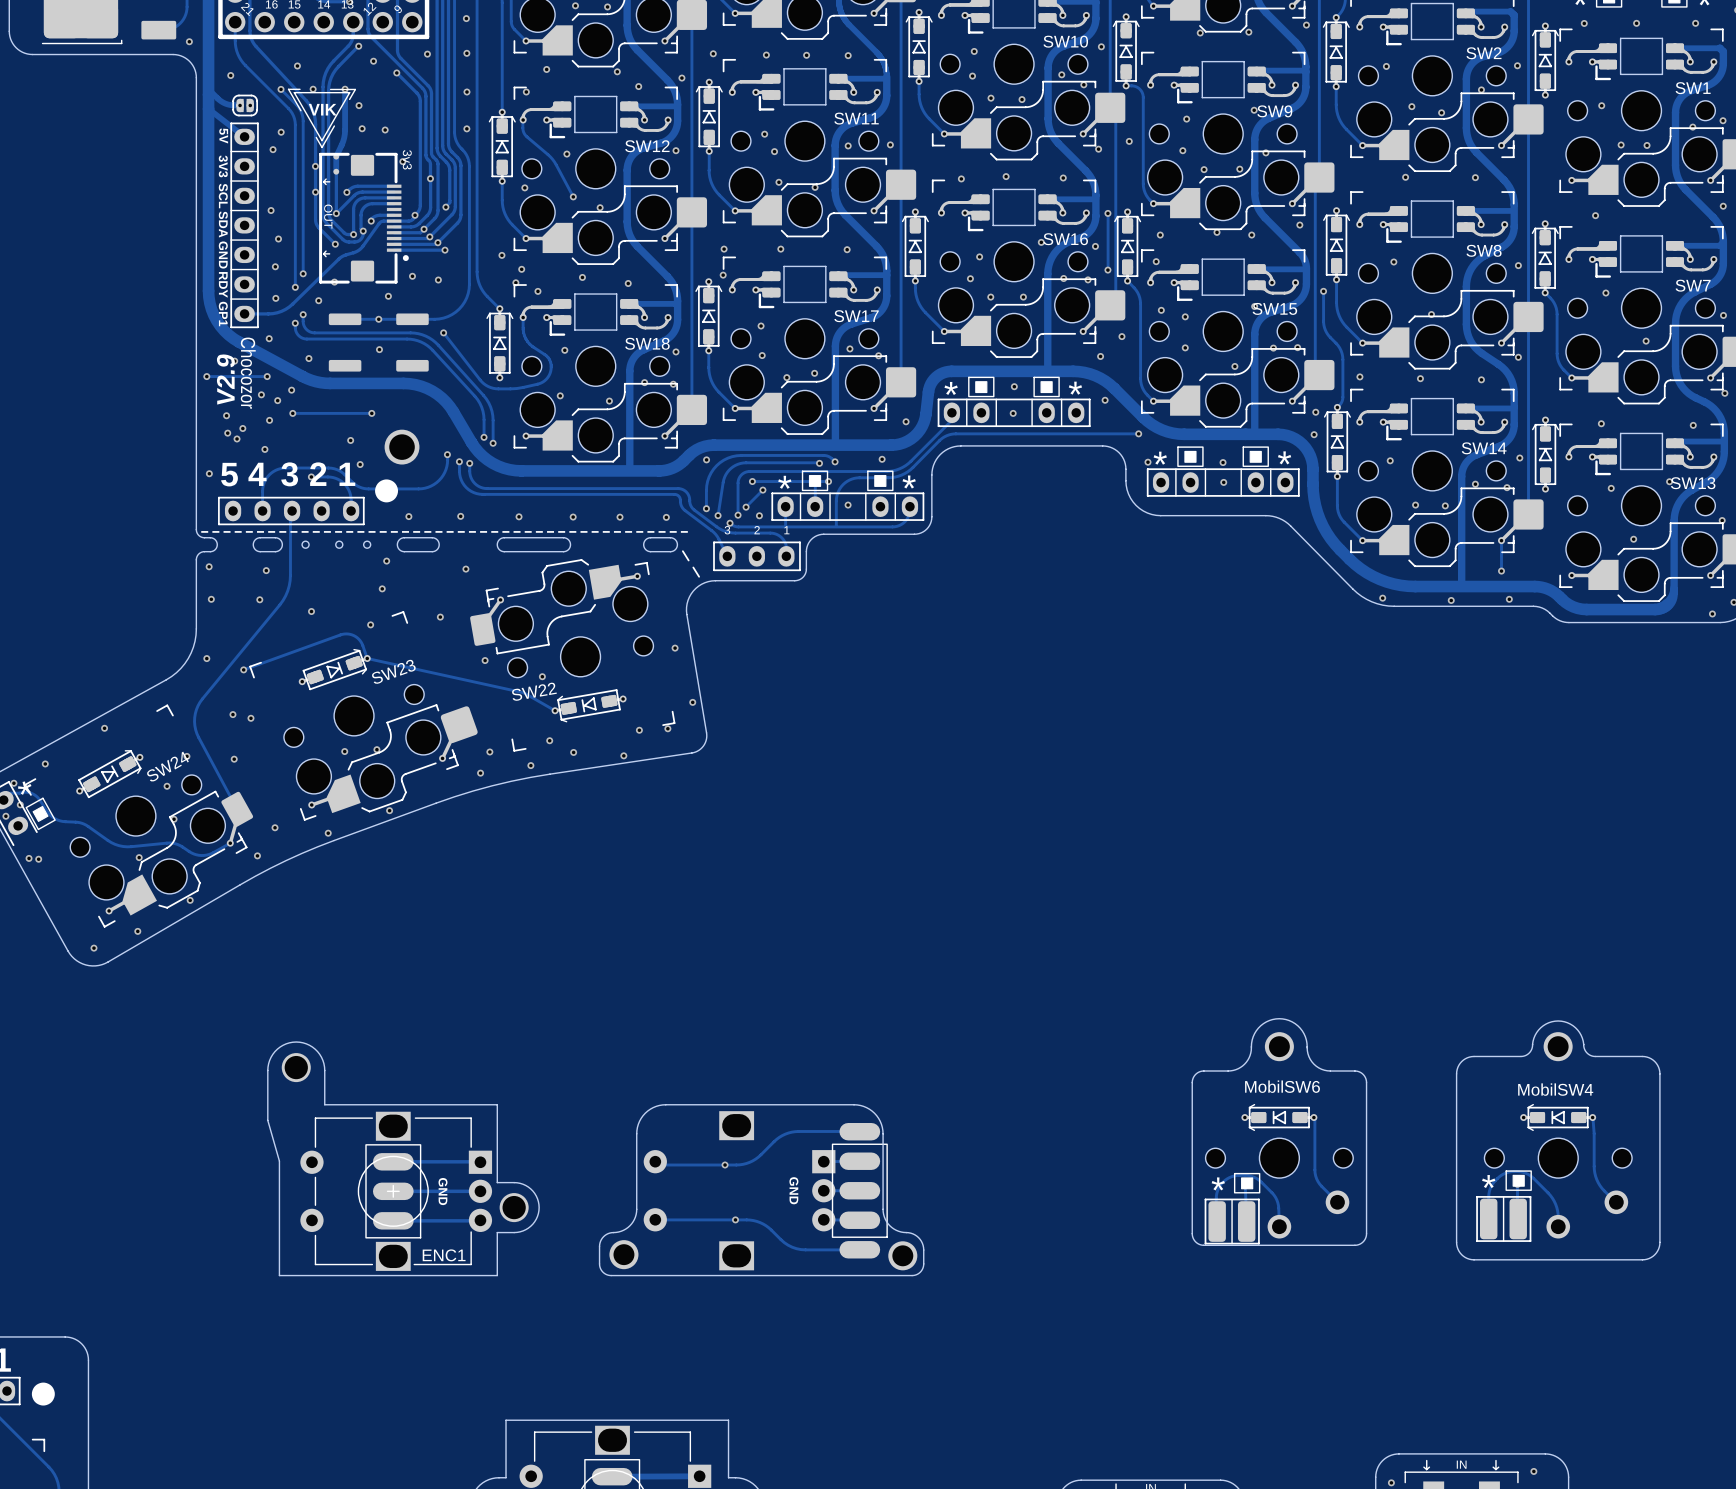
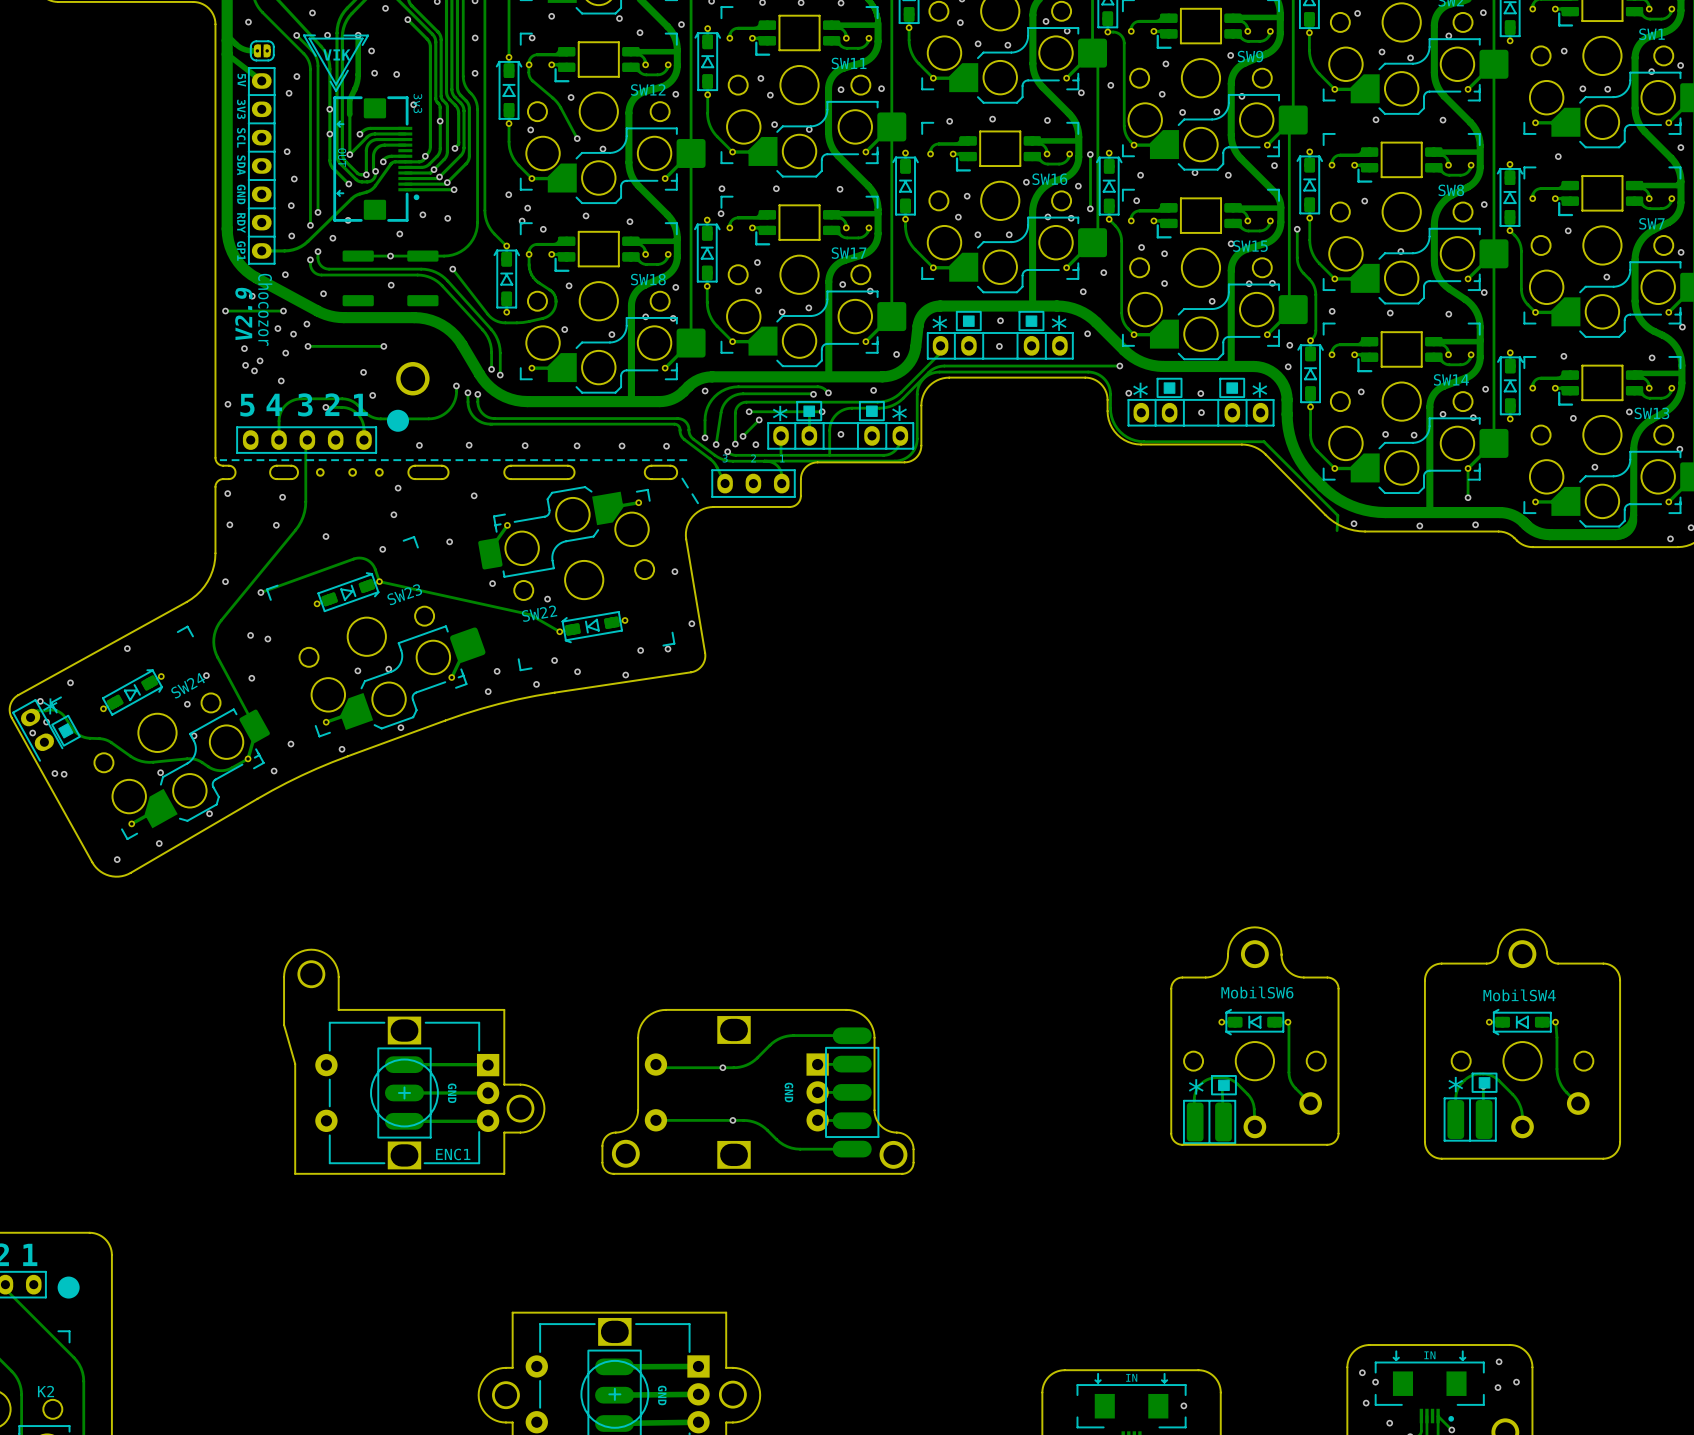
track: none -> (764, 461) (894, 461) (904, 458) (912, 452) (916, 443) (918, 386) (925, 376) (934, 372) (1090, 372) (1100, 375) (1107, 382) (1110, 391) (1113, 421) (1120, 431) (1131, 439) (1143, 441) (1264, 441) (1337, 515) (1337, 530)

